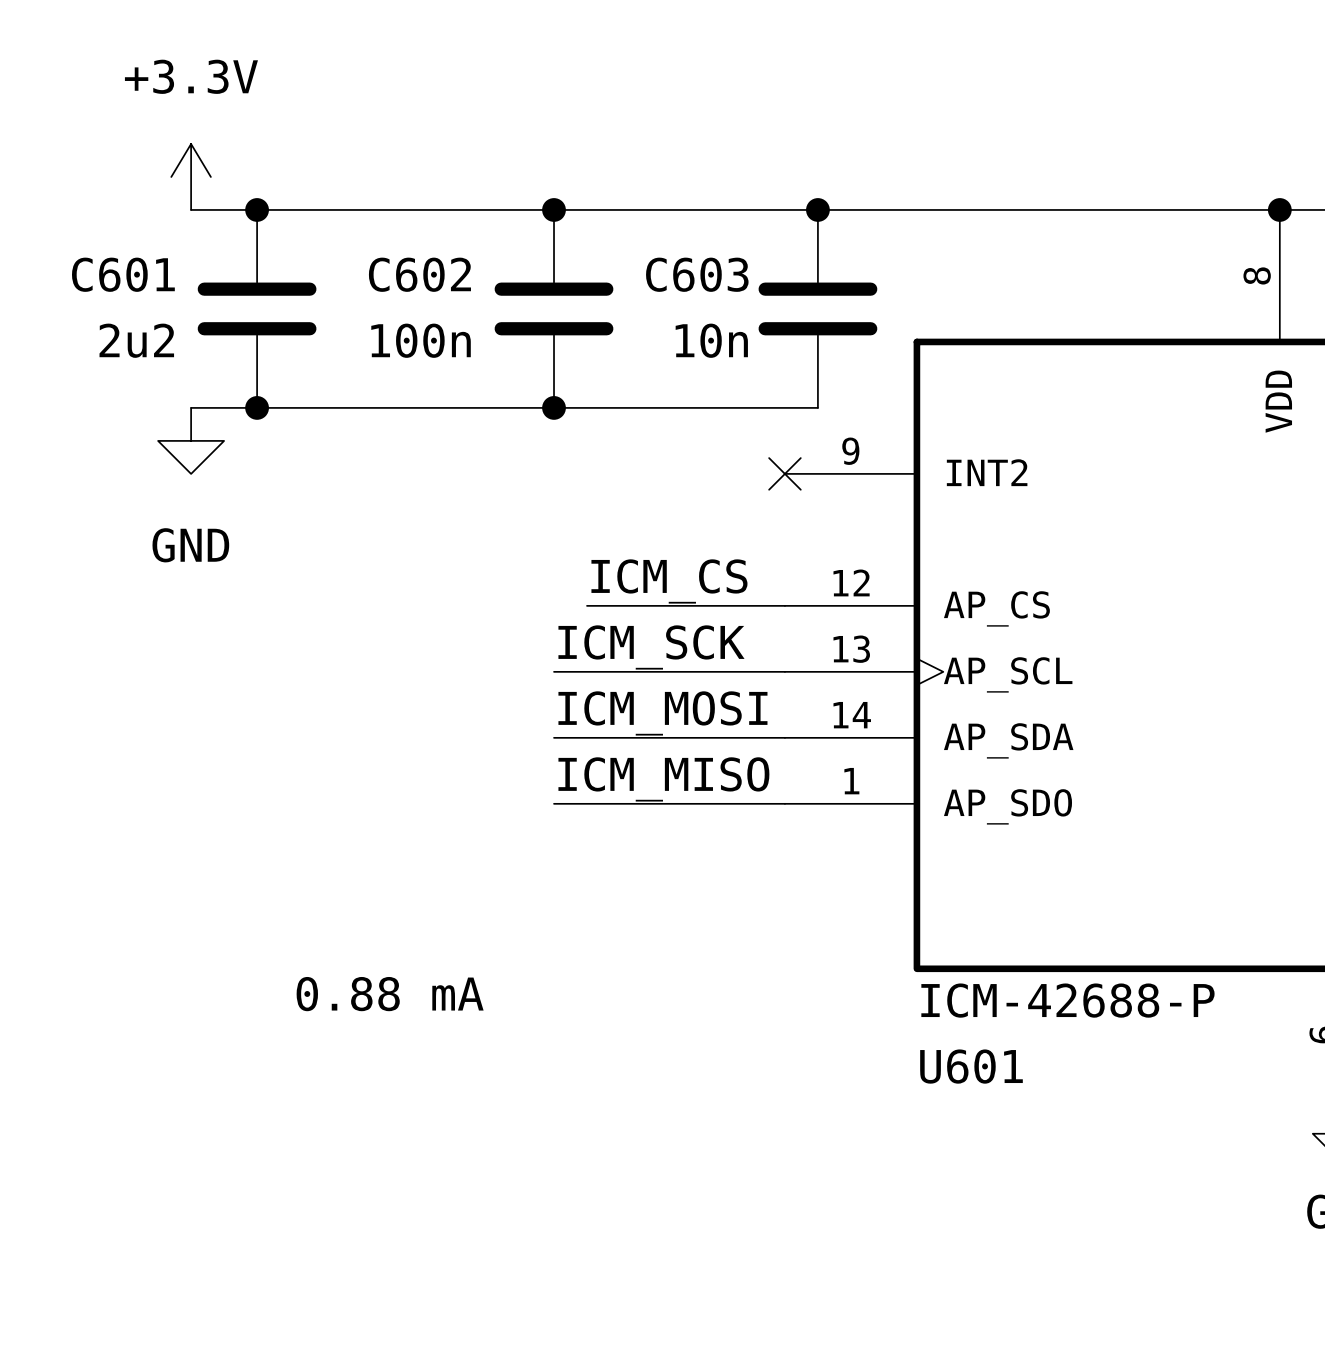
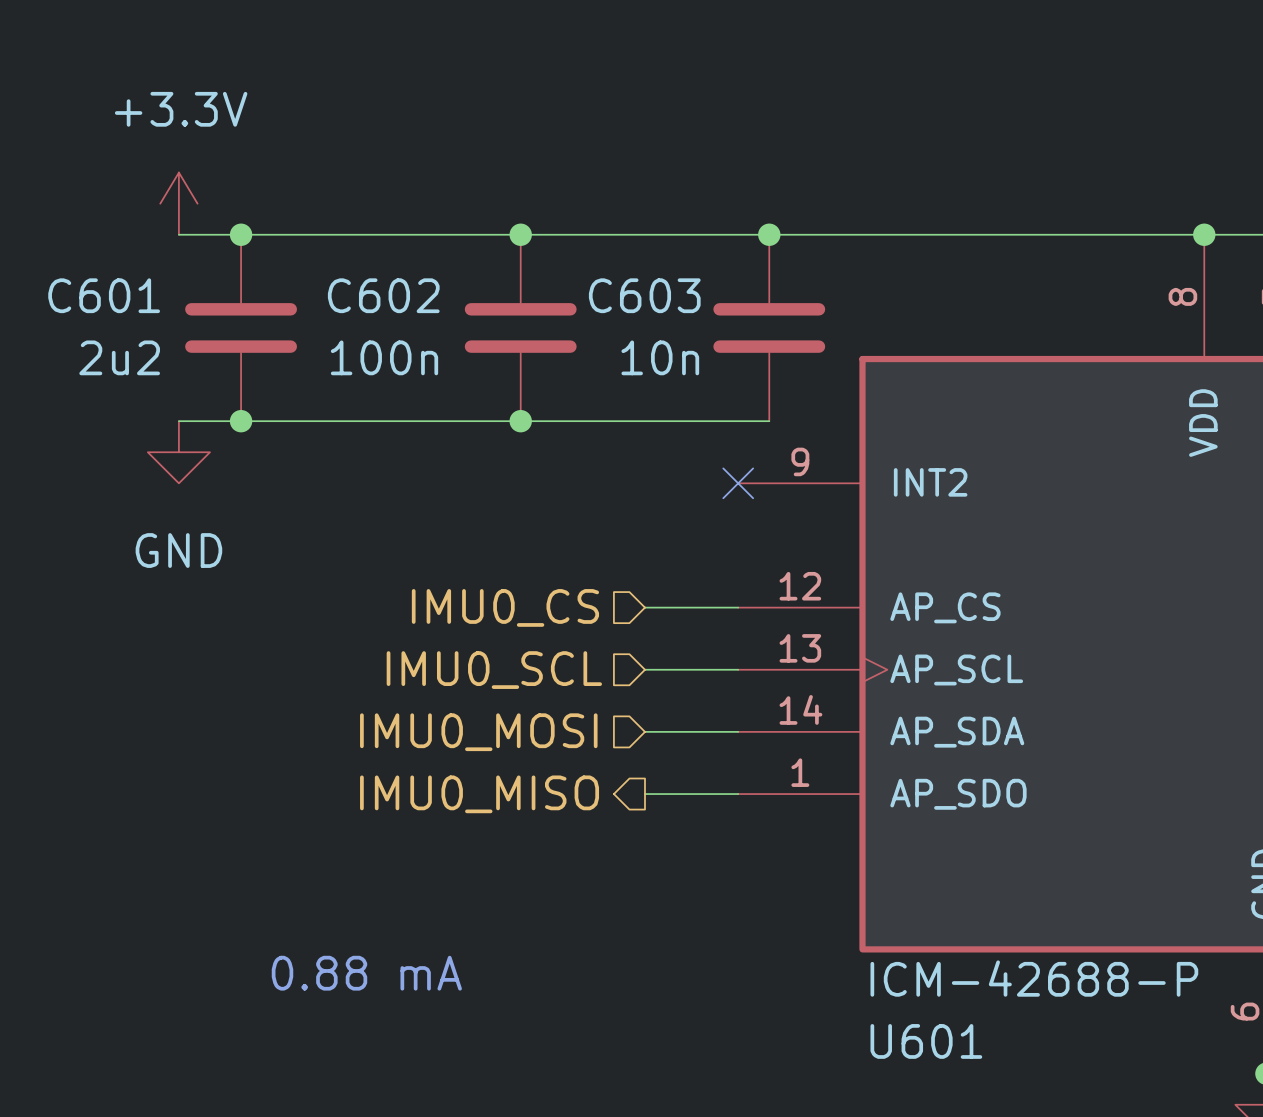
label: ICM_CS (669, 581) -> none
wire: (587, 605) (685, 605) -> none
hierarchical label: none -> IMU0_CS (505, 607)
label: ICM_SCK (651, 647) -> none
wire: (554, 671) (685, 671) -> none
hierarchical label: none -> IMU0_SCL (494, 670)
label: ICM_MOSI (662, 713) -> none
wire: (554, 737) (685, 737) -> none
hierarchical label: none -> IMU0_MOSI (478, 732)
label: ICM_MISO (663, 779) -> none
wire: (554, 803) (685, 803) -> none
hierarchical label: none -> IMU0_MISO (479, 794)

